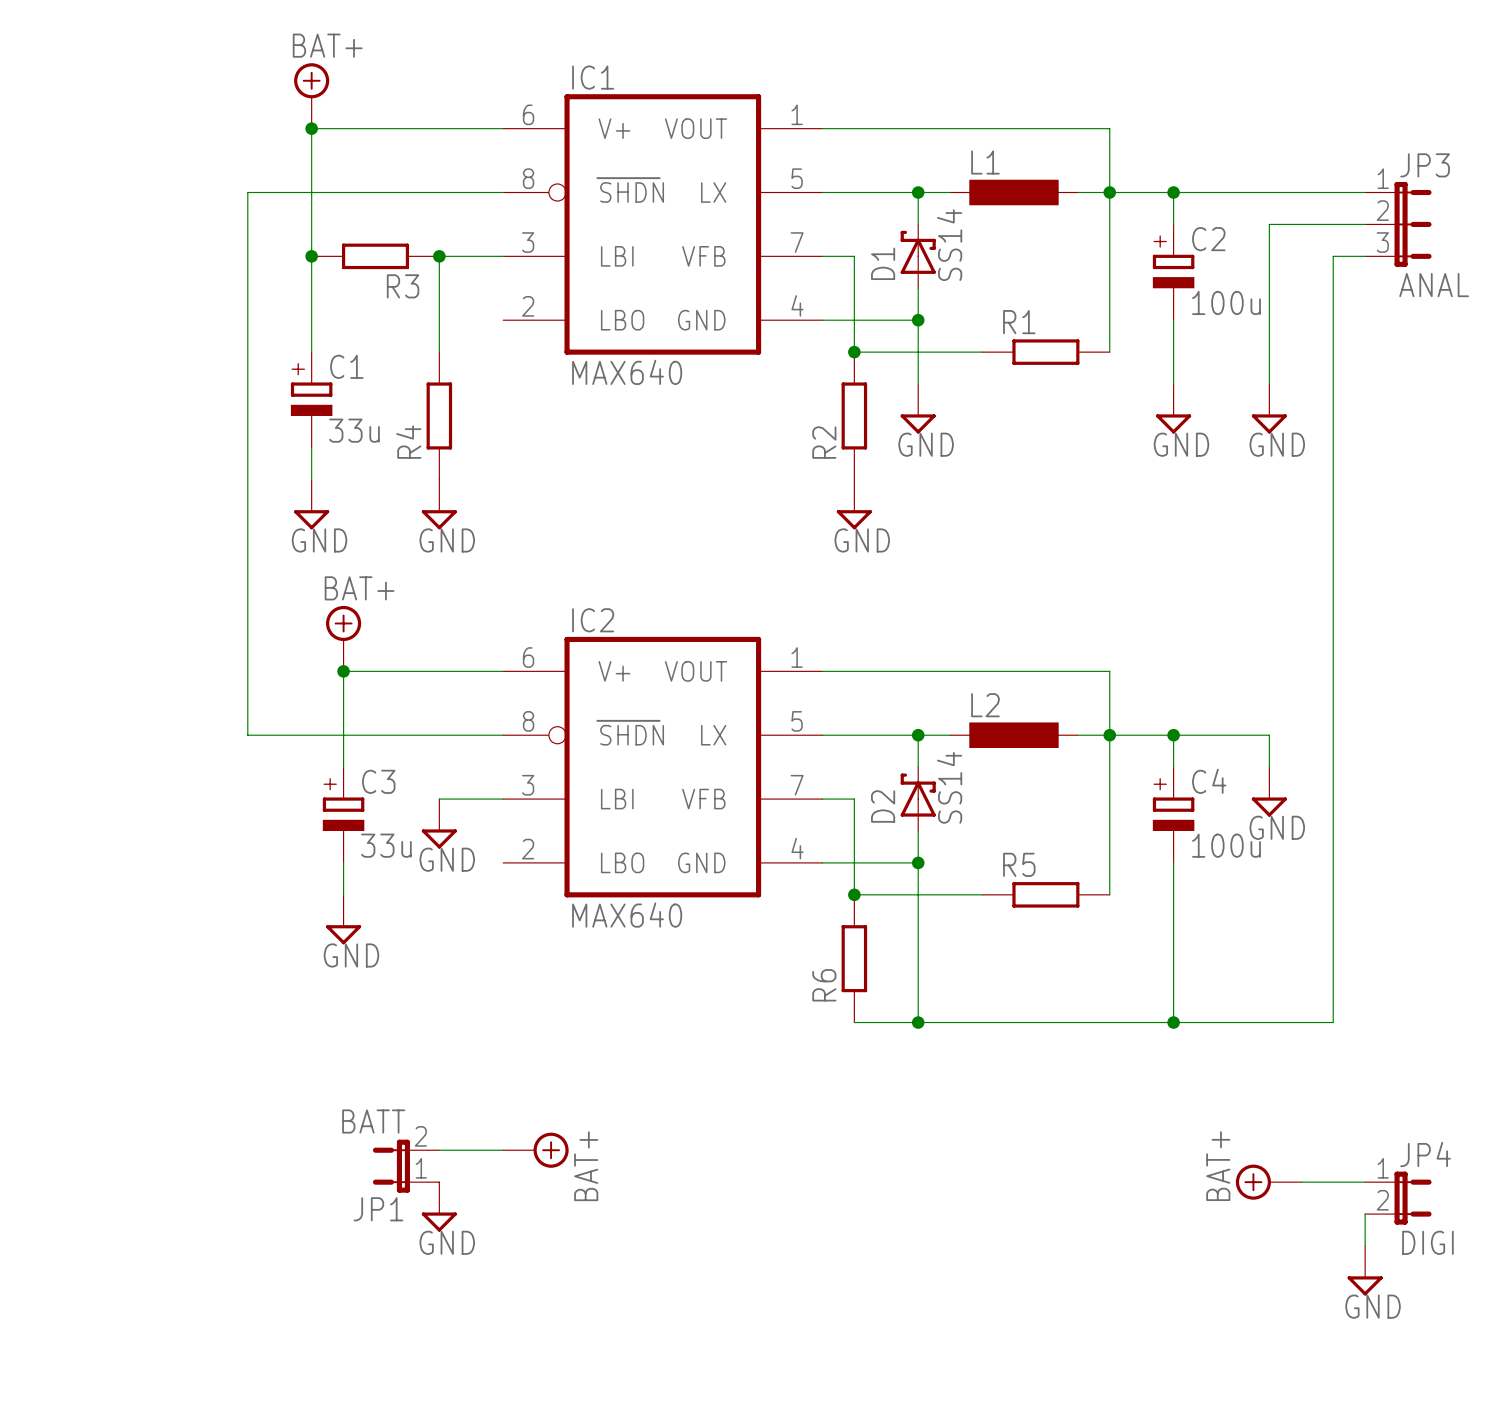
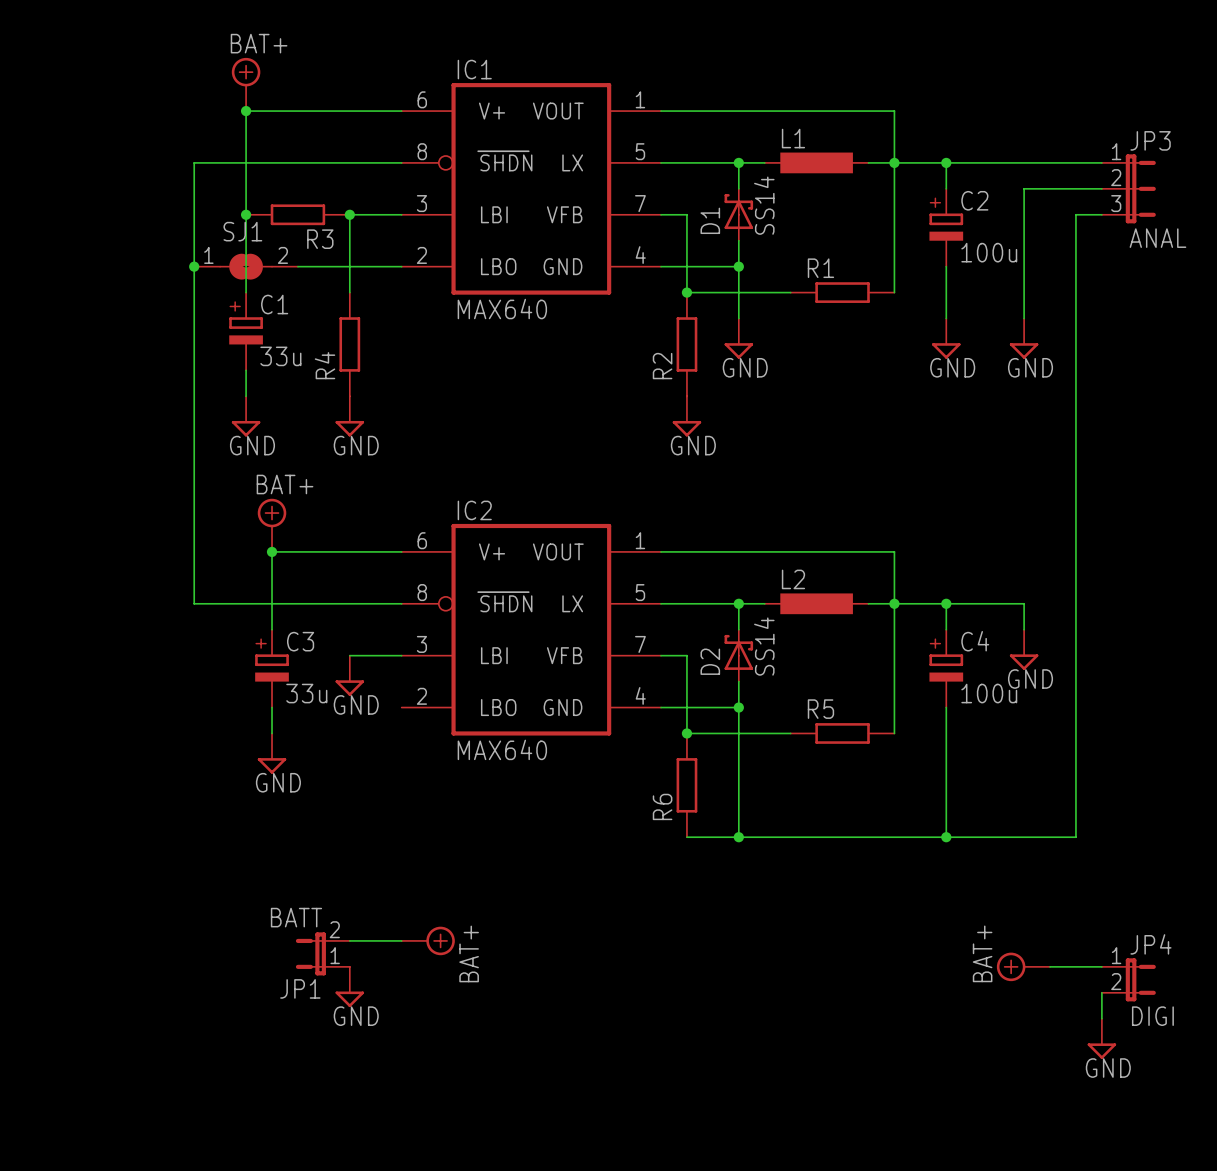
junction: none -> (194, 266)
SJ1: none -> (246, 266)
wire: none -> (297, 266) (401, 266)

